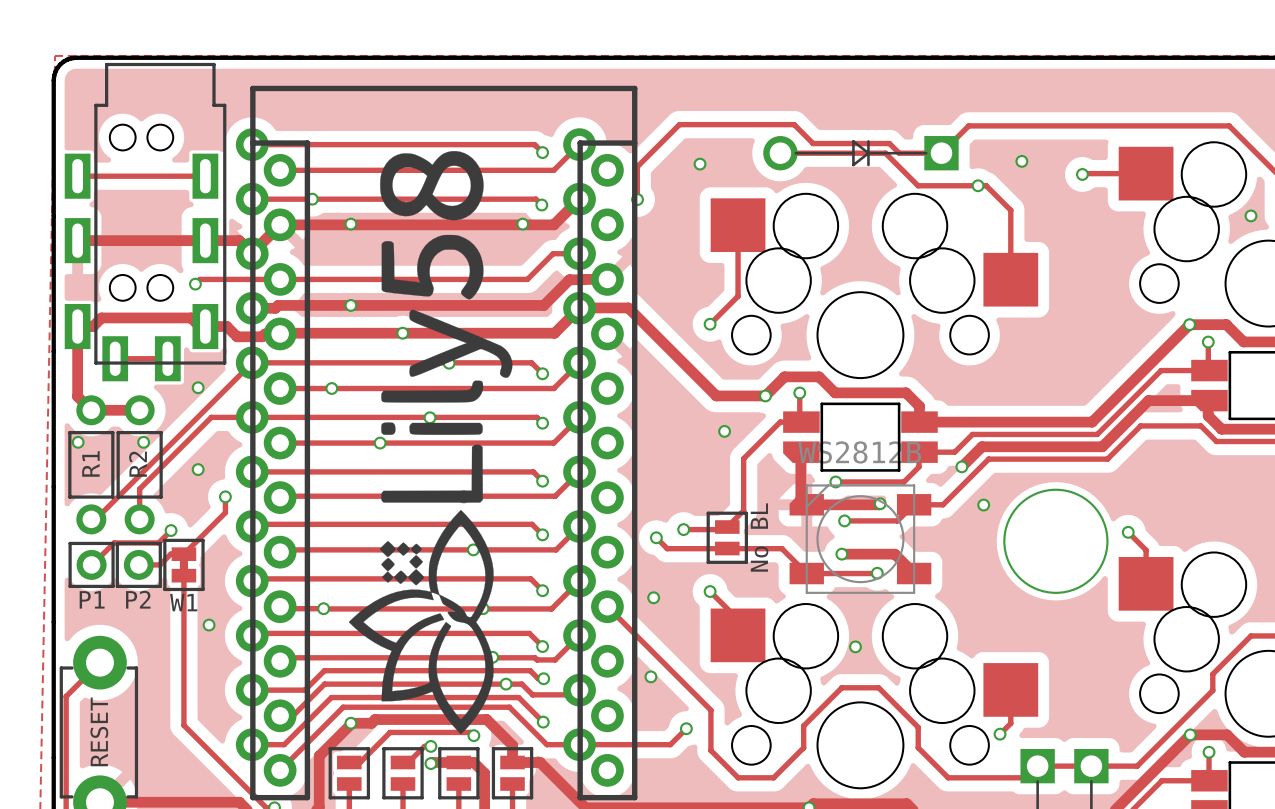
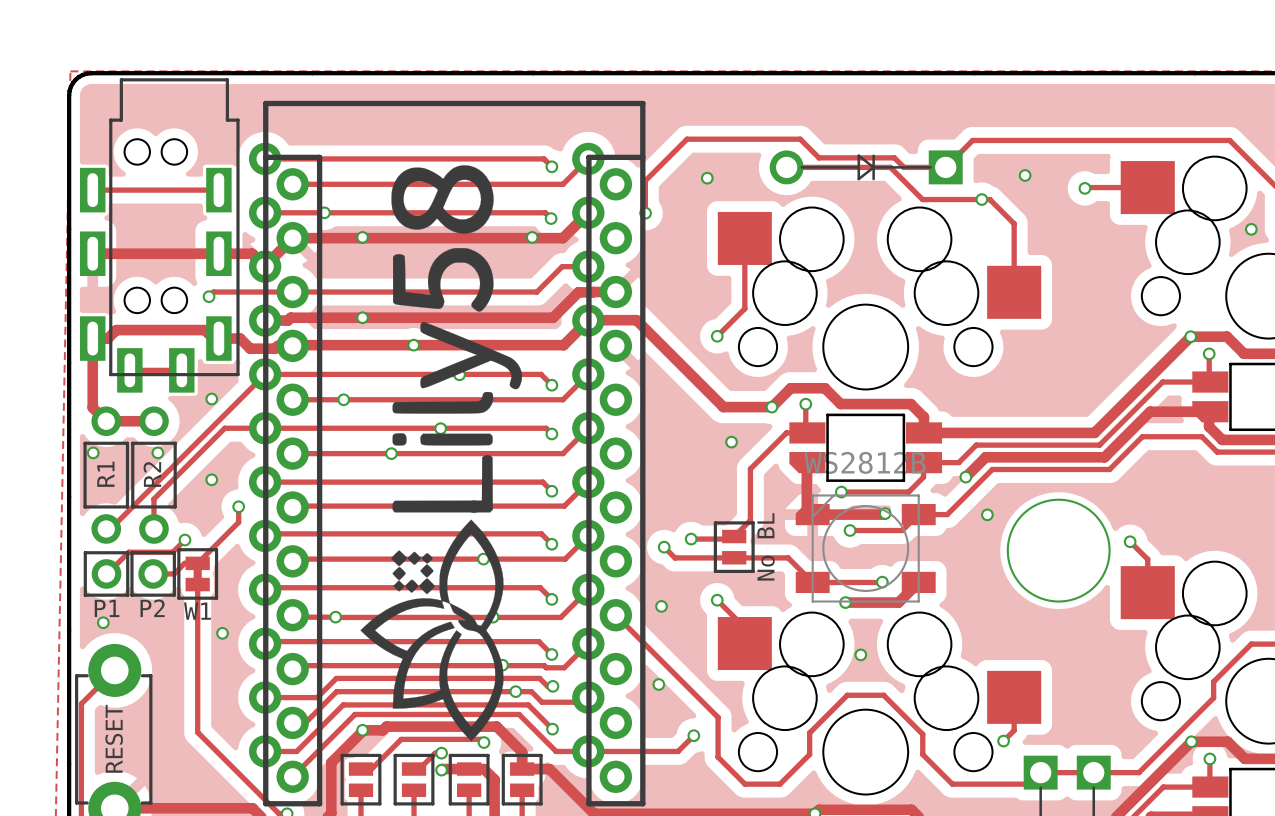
track: (841, 554) (894, 554) (914, 573) -> (845, 602) (898, 602) (918, 582)
via position: (841, 554) -> (845, 602)
via: none -> (103, 622)

